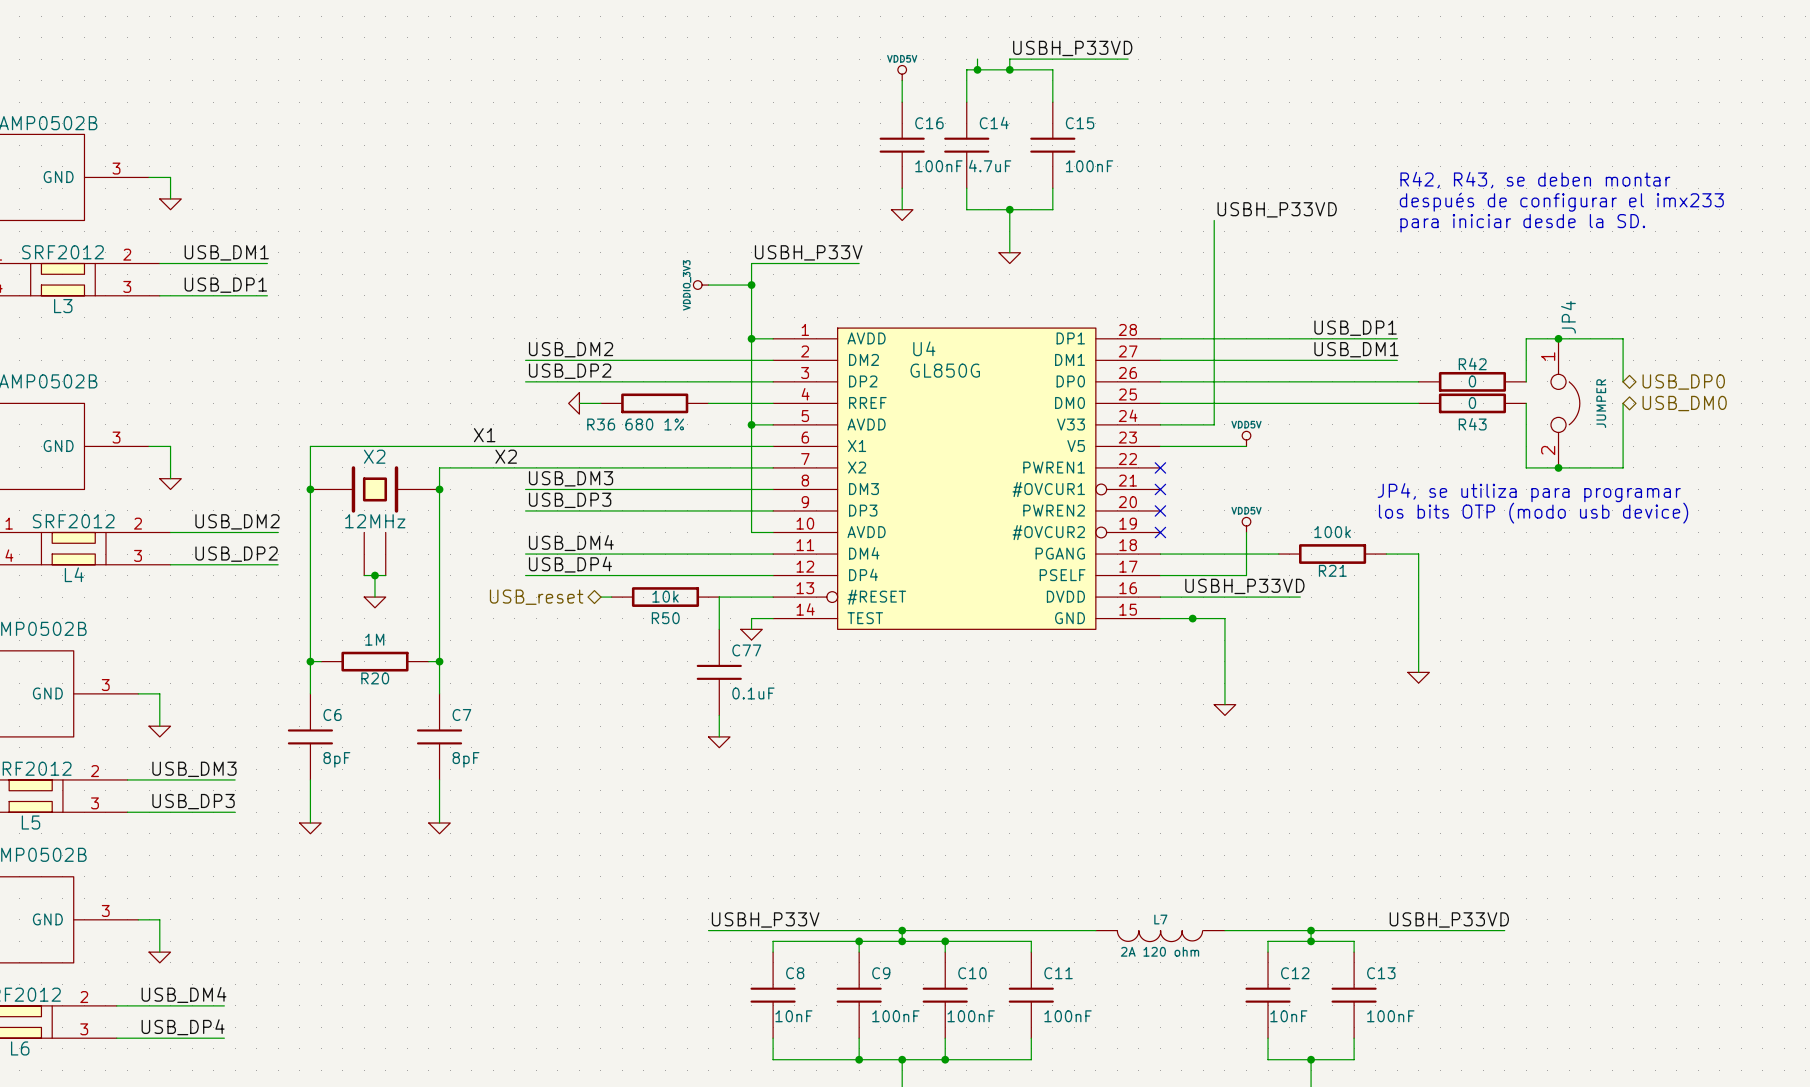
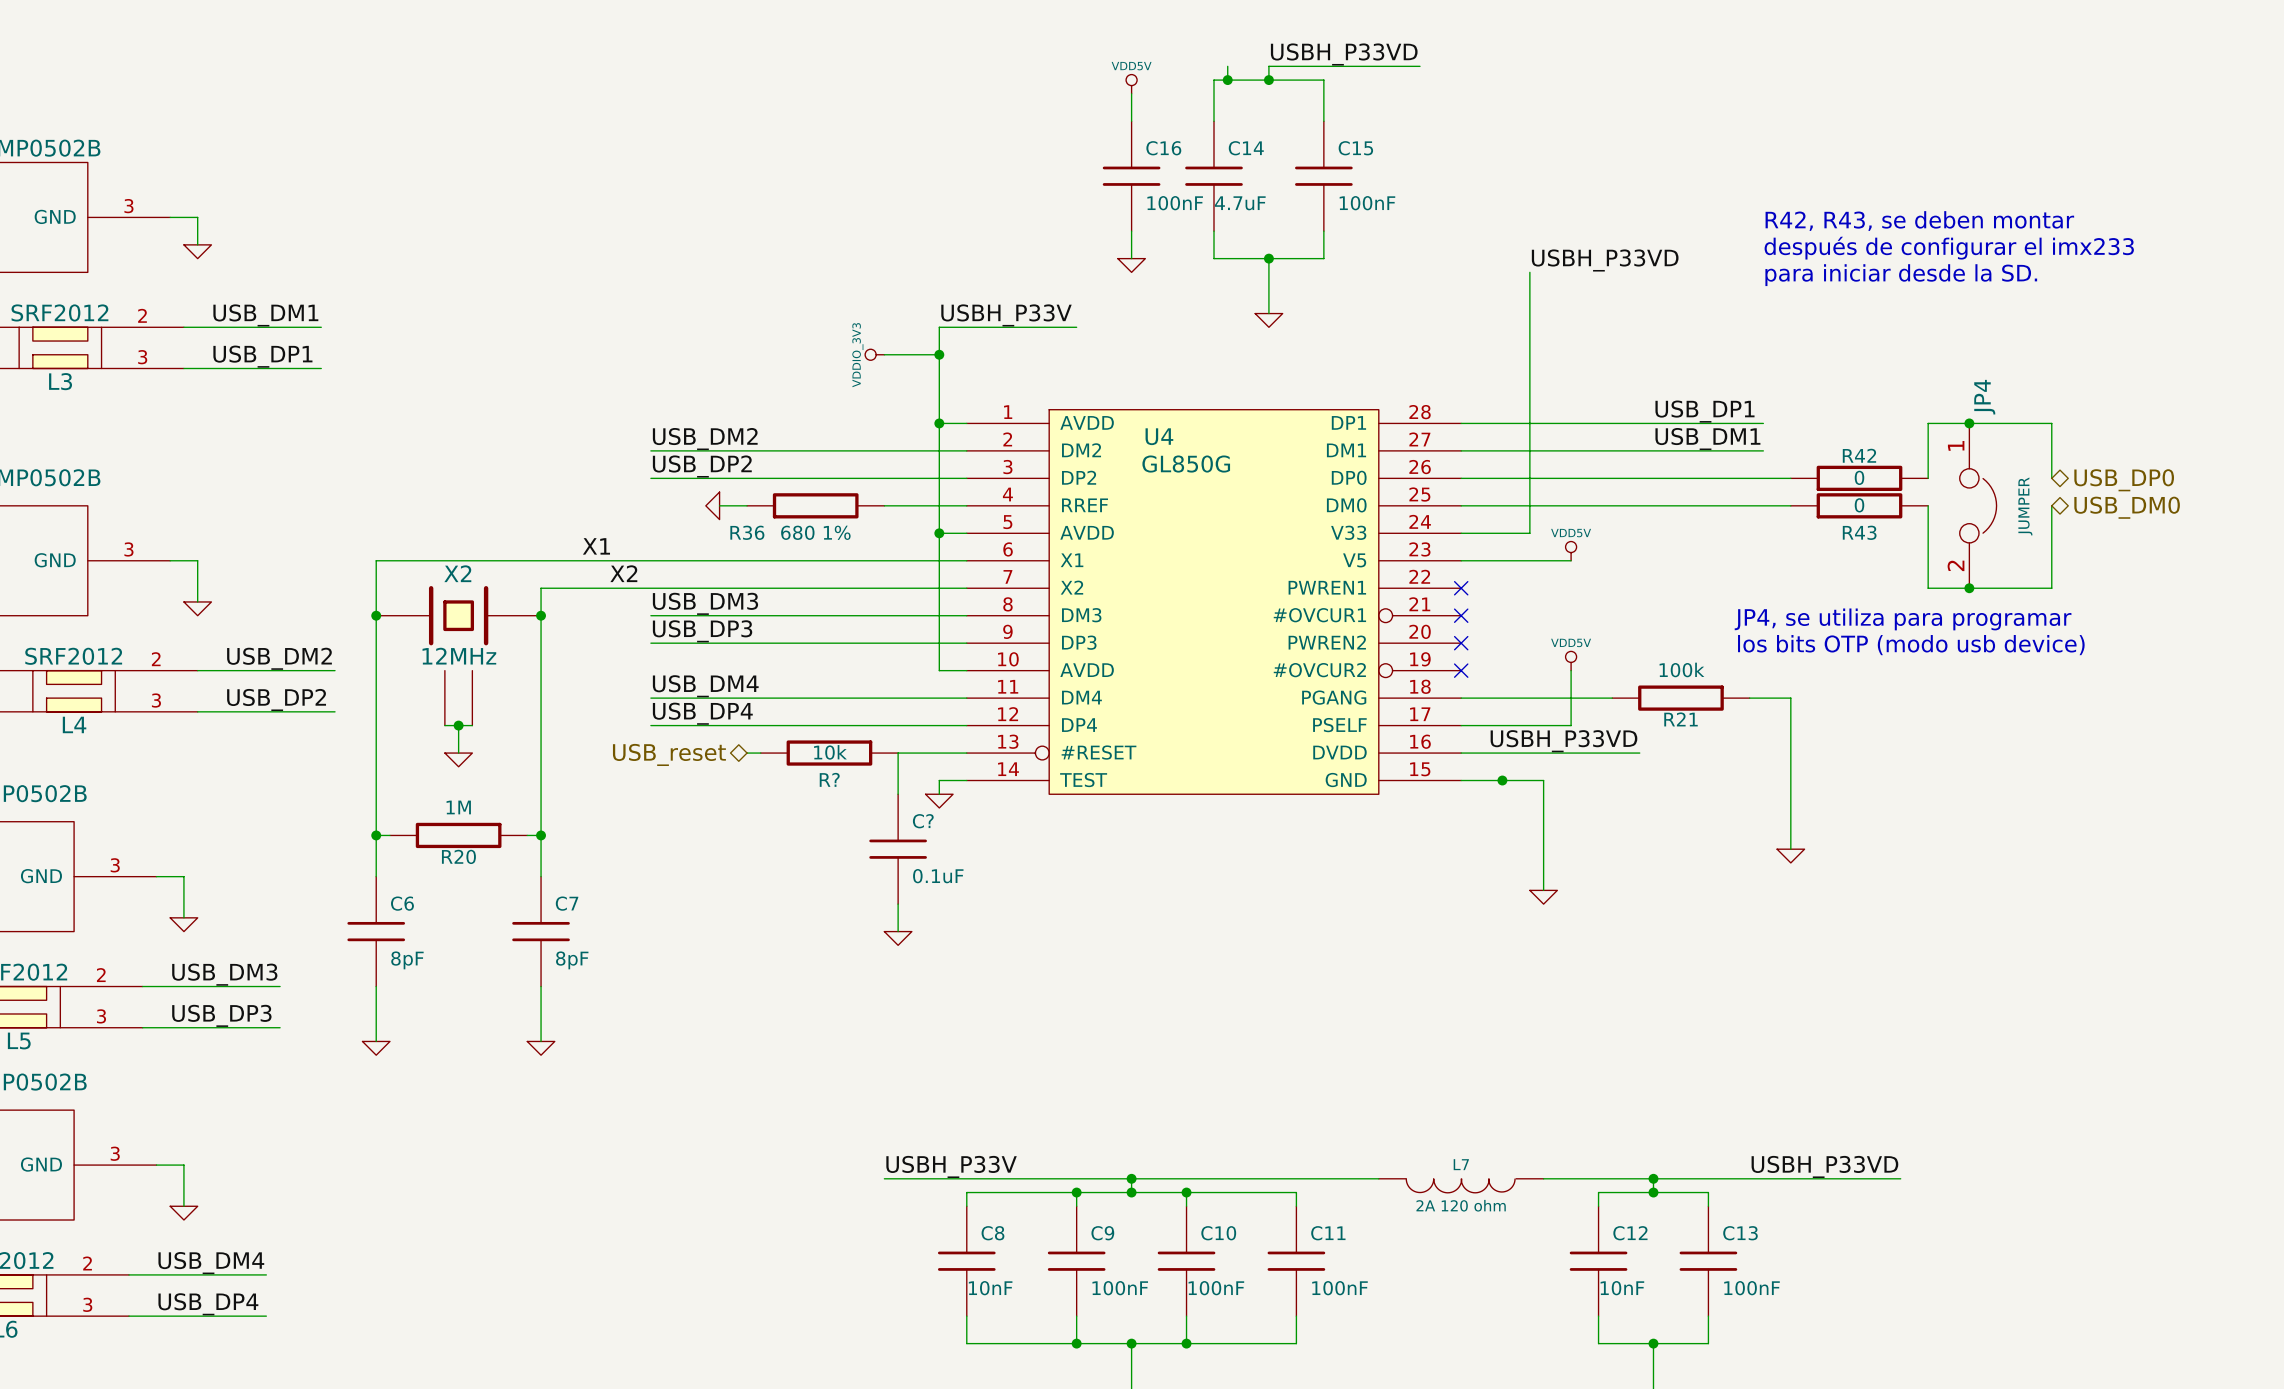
R50 name: R50 (665, 618) -> R? (829, 779)
C77 name: C77 (746, 650) -> C? (923, 821)

